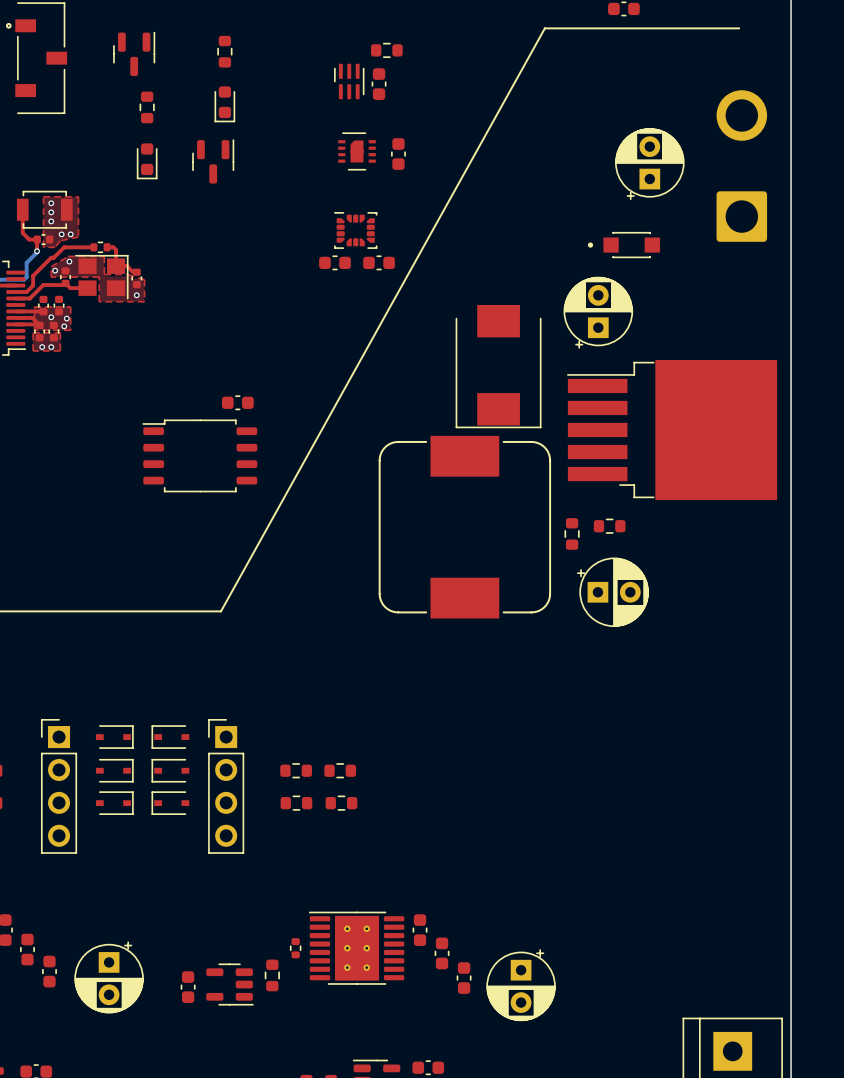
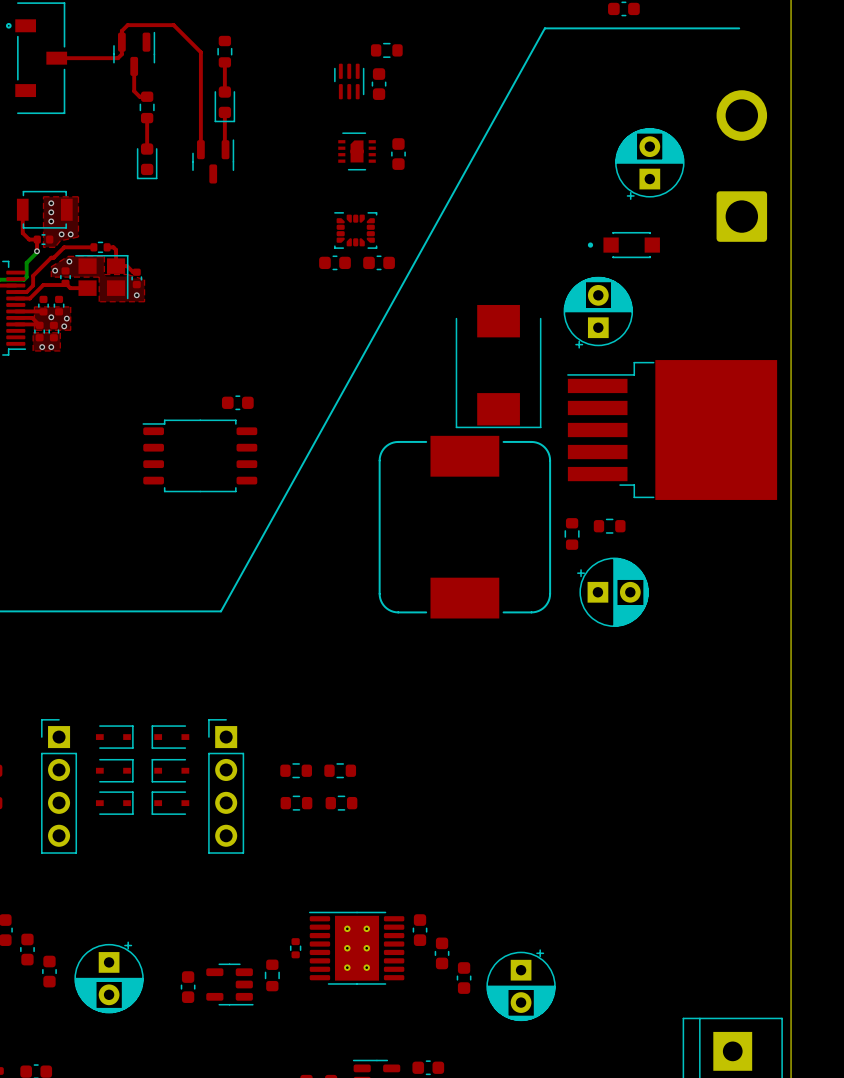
top track: none -> (56, 58) (117, 58) (121, 54) (121, 30) (127, 25) (173, 25) (200, 52) (200, 149)
top track: none -> (224, 62) (224, 92)
top track: none -> (134, 66) (134, 91) (139, 96) (147, 96)
top track: none -> (224, 112) (225, 149)
top track: none -> (147, 118) (147, 149)

